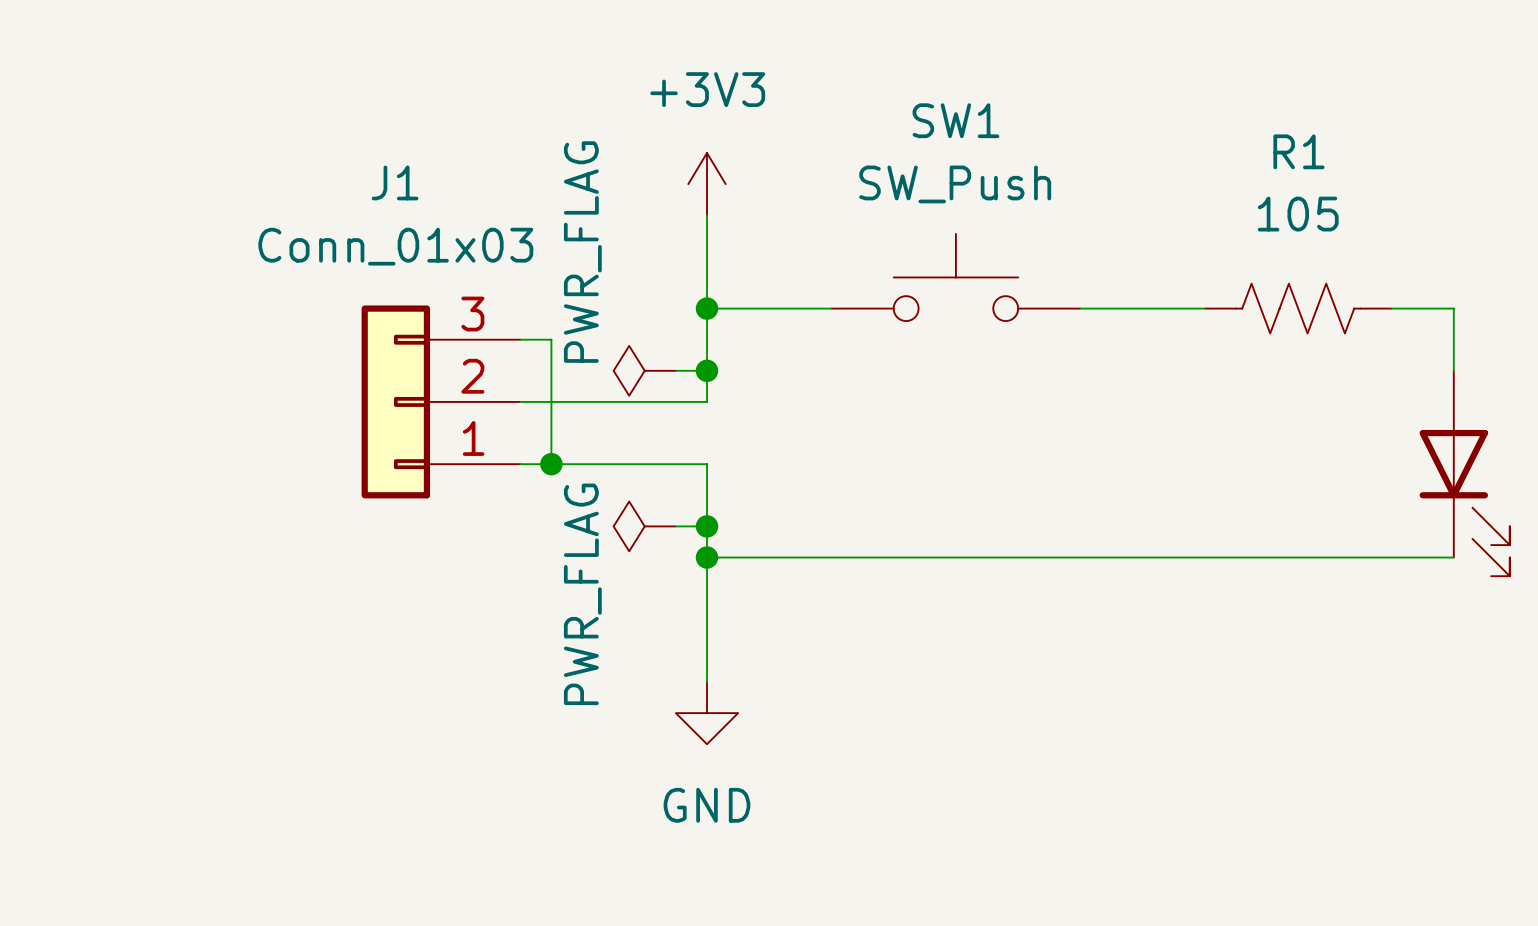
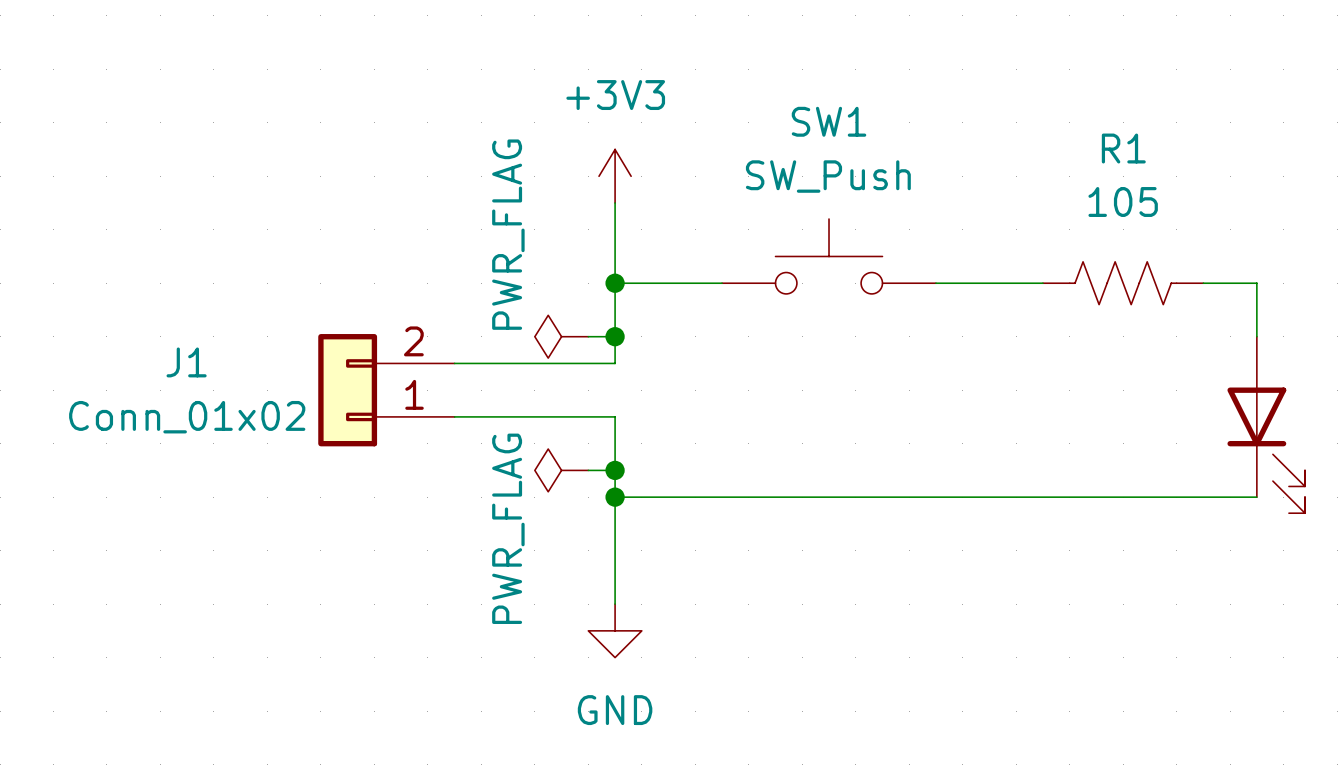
J1 name position: J1 (395, 182) -> J1 (186, 362)
J1 value: Conn_01x03 (395, 246) -> Conn_01x02 (187, 417)
J1 symbol: [361, 305, 521, 499] -> [318, 334, 455, 447]
wire: (520, 339) (551, 339) (551, 464) -> none
junction: (551, 464) -> none

